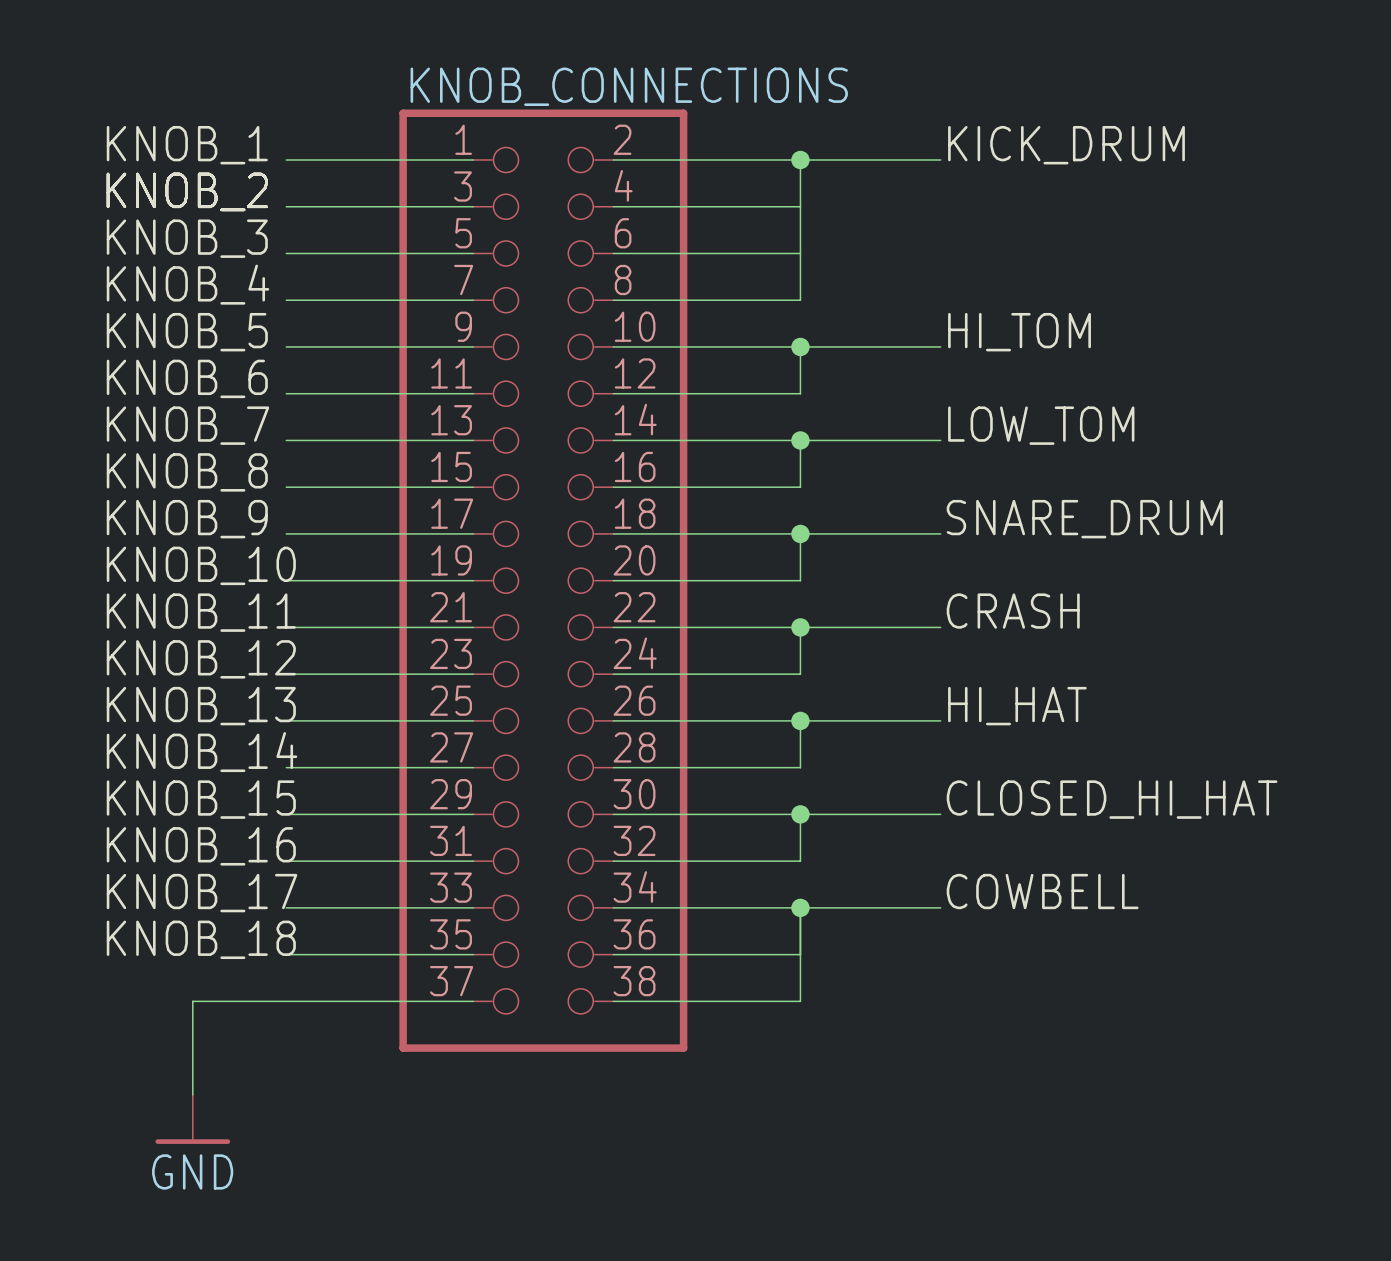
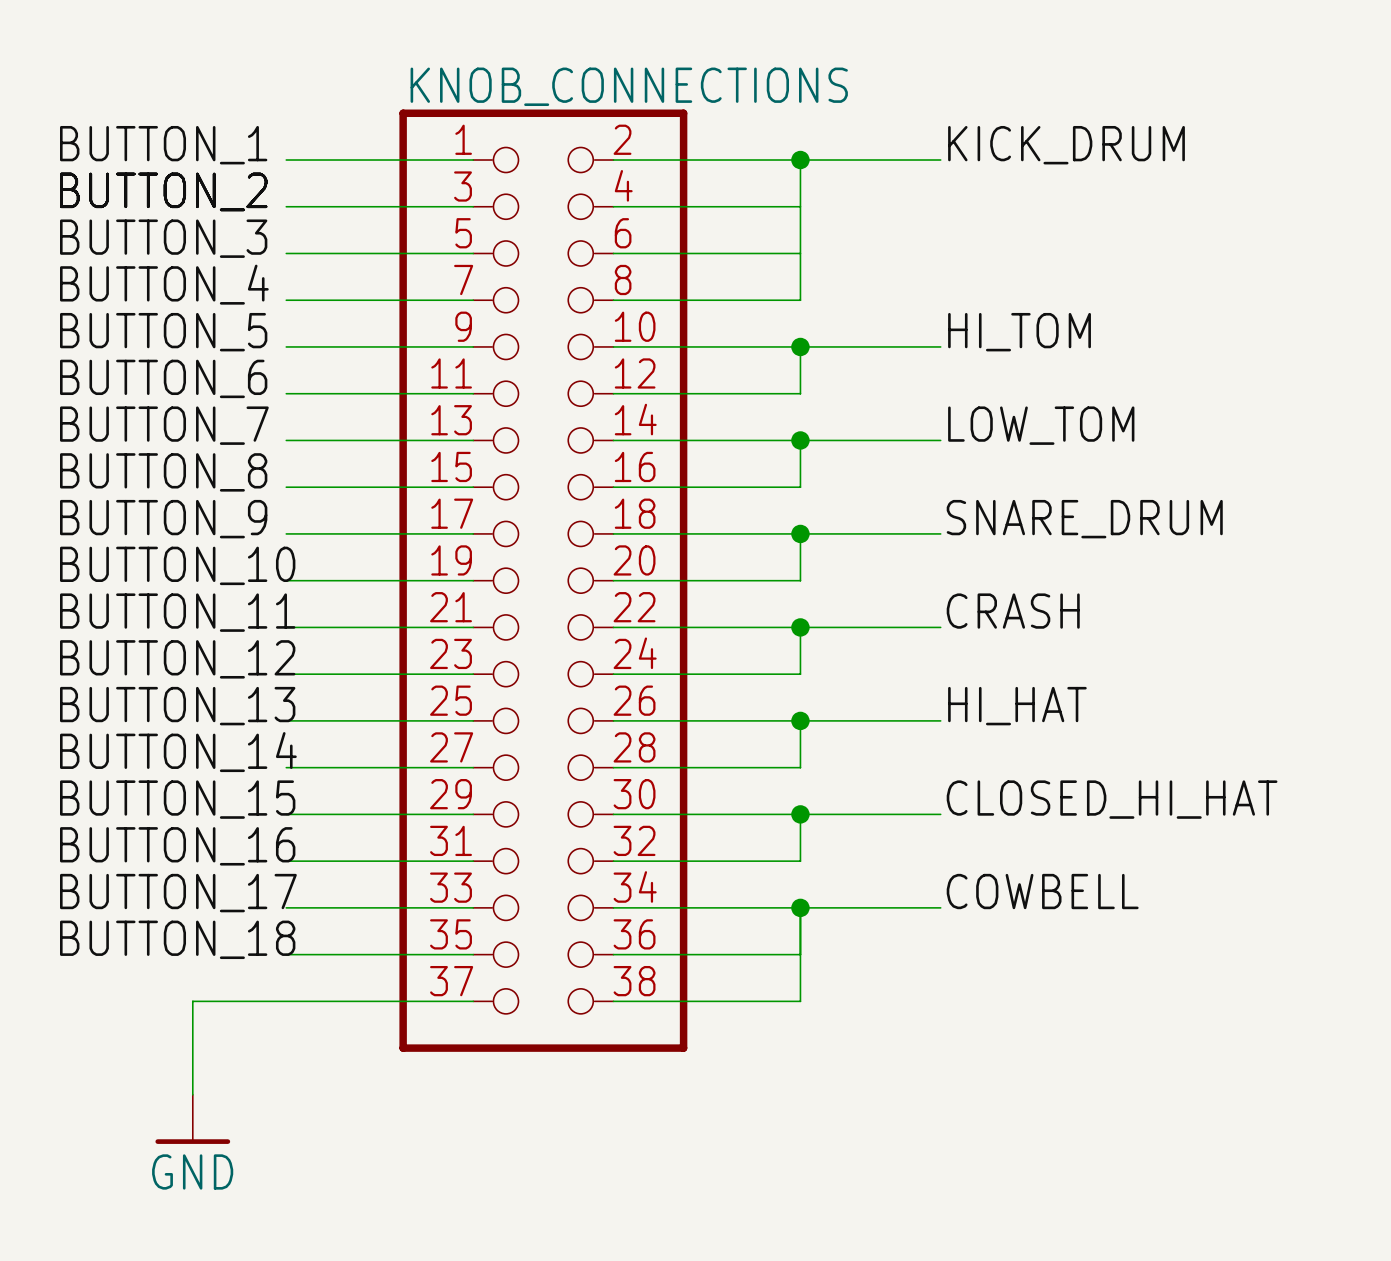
label: none -> BUTTON_1 (163, 145)
label: KNOB_1 (187, 145) -> none
label: none -> BUTTON_2 (163, 191)
label: KNOB_2 (187, 191) -> none
label: none -> BUTTON_3 (163, 238)
label: KNOB_3 (187, 238) -> none
label: none -> BUTTON_4 (164, 284)
label: KNOB_4 (187, 284) -> none
label: none -> BUTTON_5 (163, 332)
label: KNOB_5 (187, 332) -> none
label: none -> BUTTON_6 (163, 378)
label: KNOB_6 (187, 378) -> none
label: none -> BUTTON_7 (164, 425)
label: KNOB_7 (187, 425) -> none
label: none -> BUTTON_8 (163, 472)
label: KNOB_8 (187, 472) -> none
label: none -> BUTTON_9 (163, 519)
label: KNOB_9 (187, 519) -> none
label: none -> BUTTON_10 (177, 565)
label: KNOB_10 (201, 565) -> none
label: none -> BUTTON_11 (177, 612)
label: KNOB_11 (201, 612) -> none
label: none -> BUTTON_12 (177, 659)
label: KNOB_12 (201, 659) -> none
label: none -> BUTTON_13 (177, 706)
label: KNOB_13 (201, 706) -> none
label: none -> BUTTON_14 (178, 752)
label: KNOB_14 (202, 752) -> none
label: none -> BUTTON_15 (177, 799)
label: KNOB_15 (201, 799) -> none
label: none -> BUTTON_16 (177, 846)
label: KNOB_16 (201, 846) -> none
label: none -> BUTTON_17 (178, 893)
label: KNOB_17 (202, 893) -> none
label: none -> BUTTON_18 (177, 939)
label: KNOB_18 (201, 939) -> none

